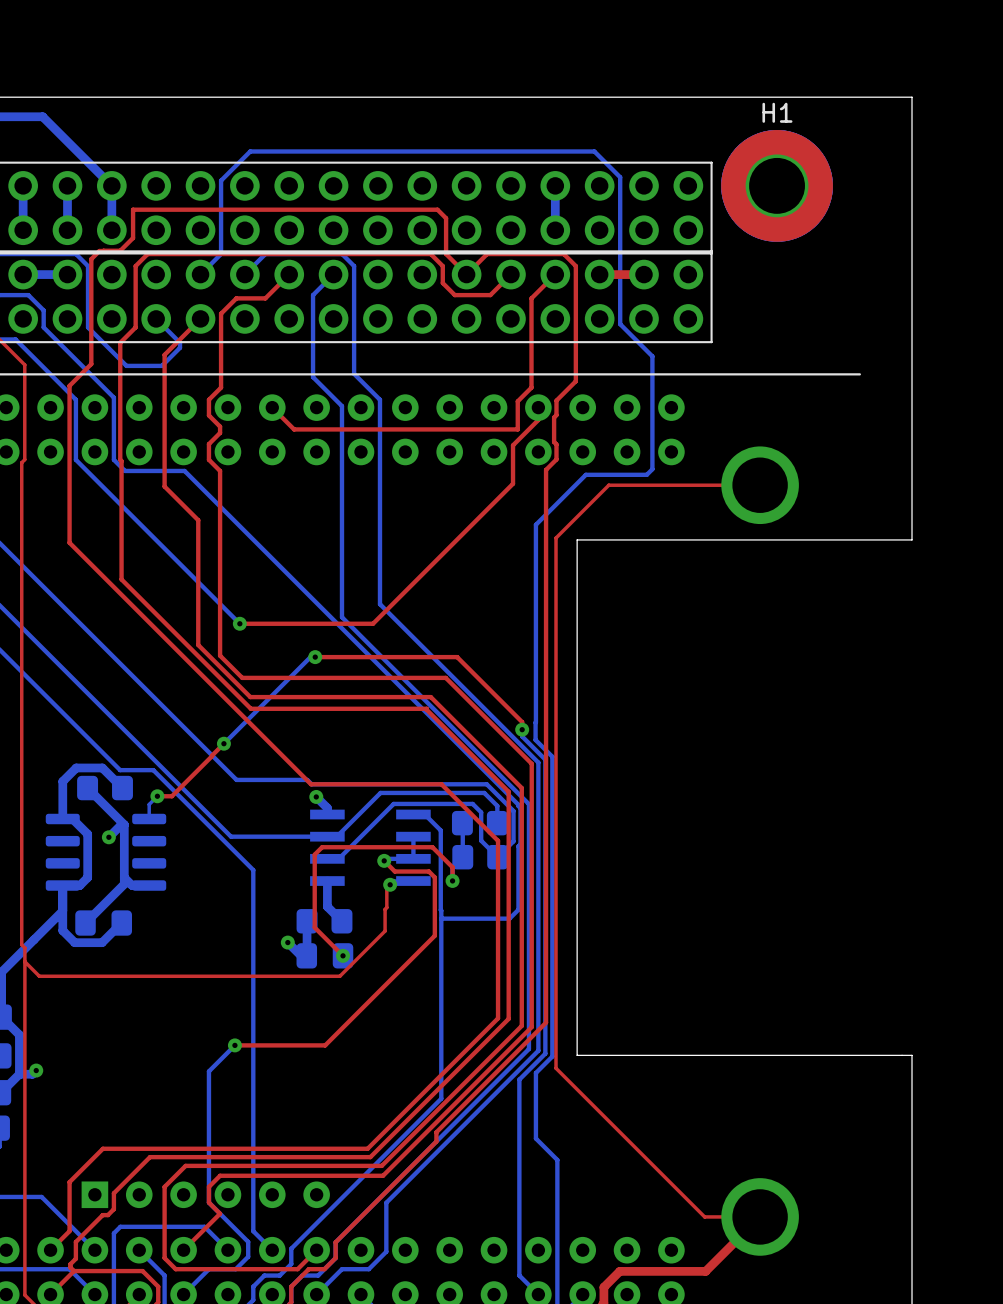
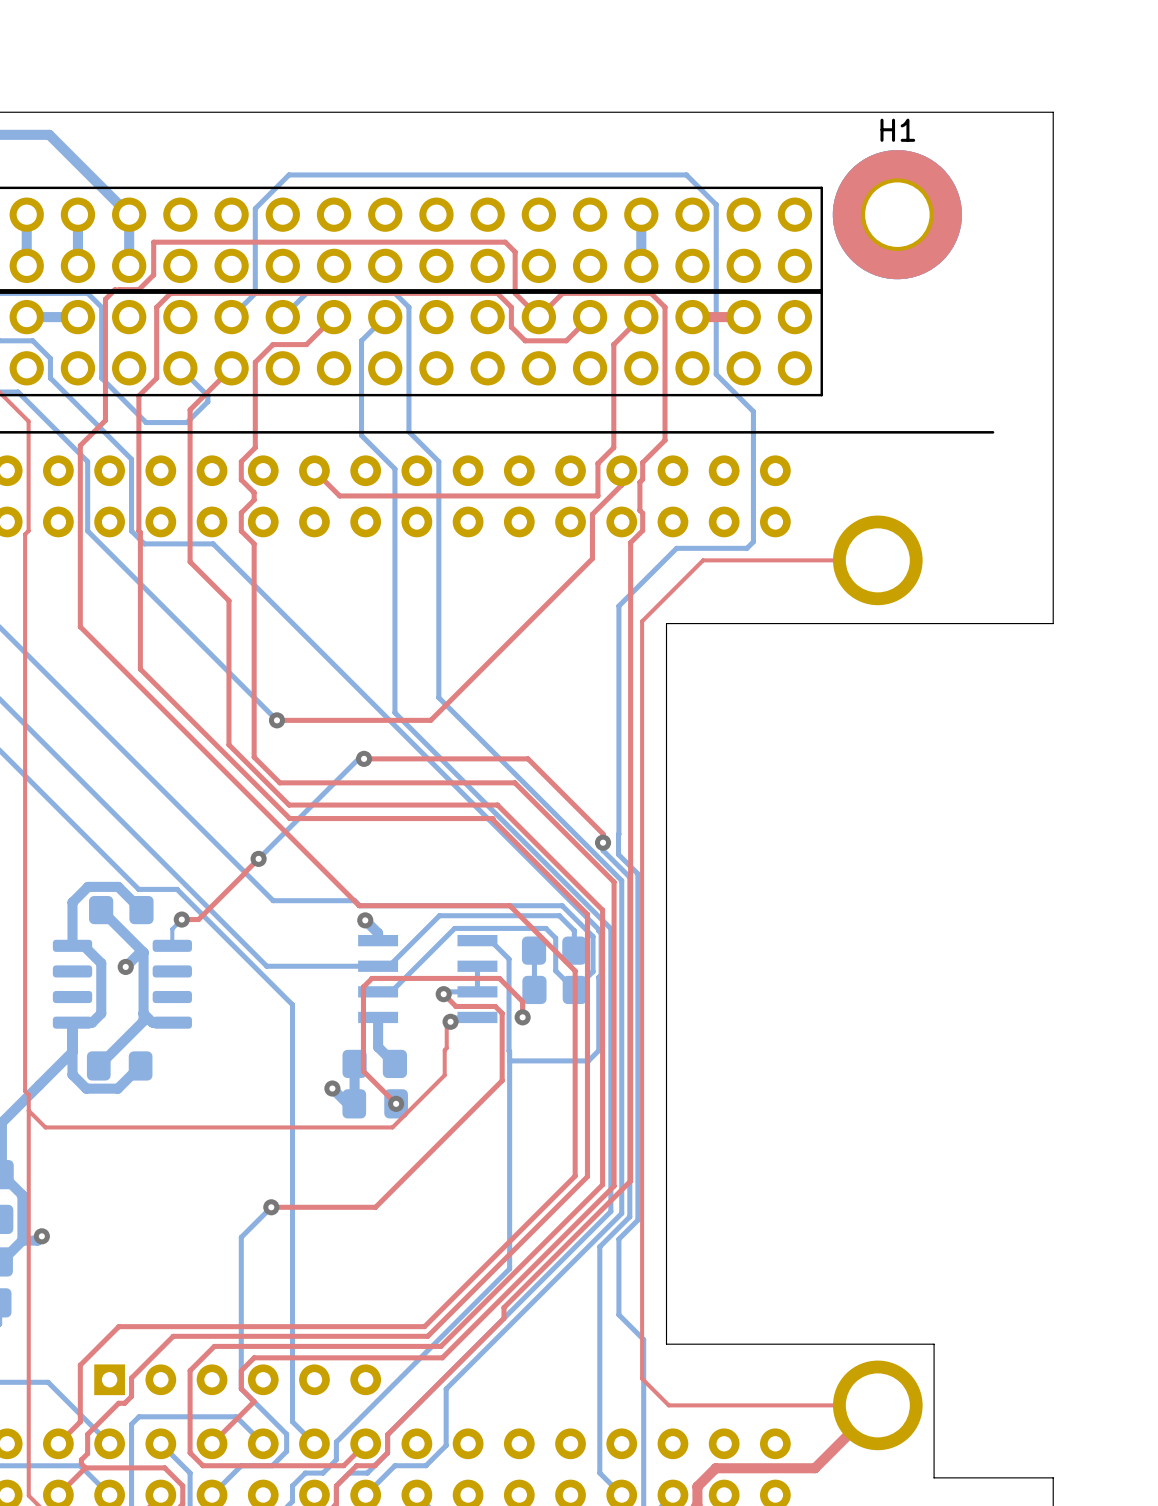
board edge: (577, 1055) (912, 1055) (912, 1279) -> (666, 1218) (666, 1344) (934, 1344) (934, 1477) (1053, 1477)
top track: (556, 1068) (704, 1216) -> (642, 1233) (642, 1378) (668, 1405) (813, 1405)

